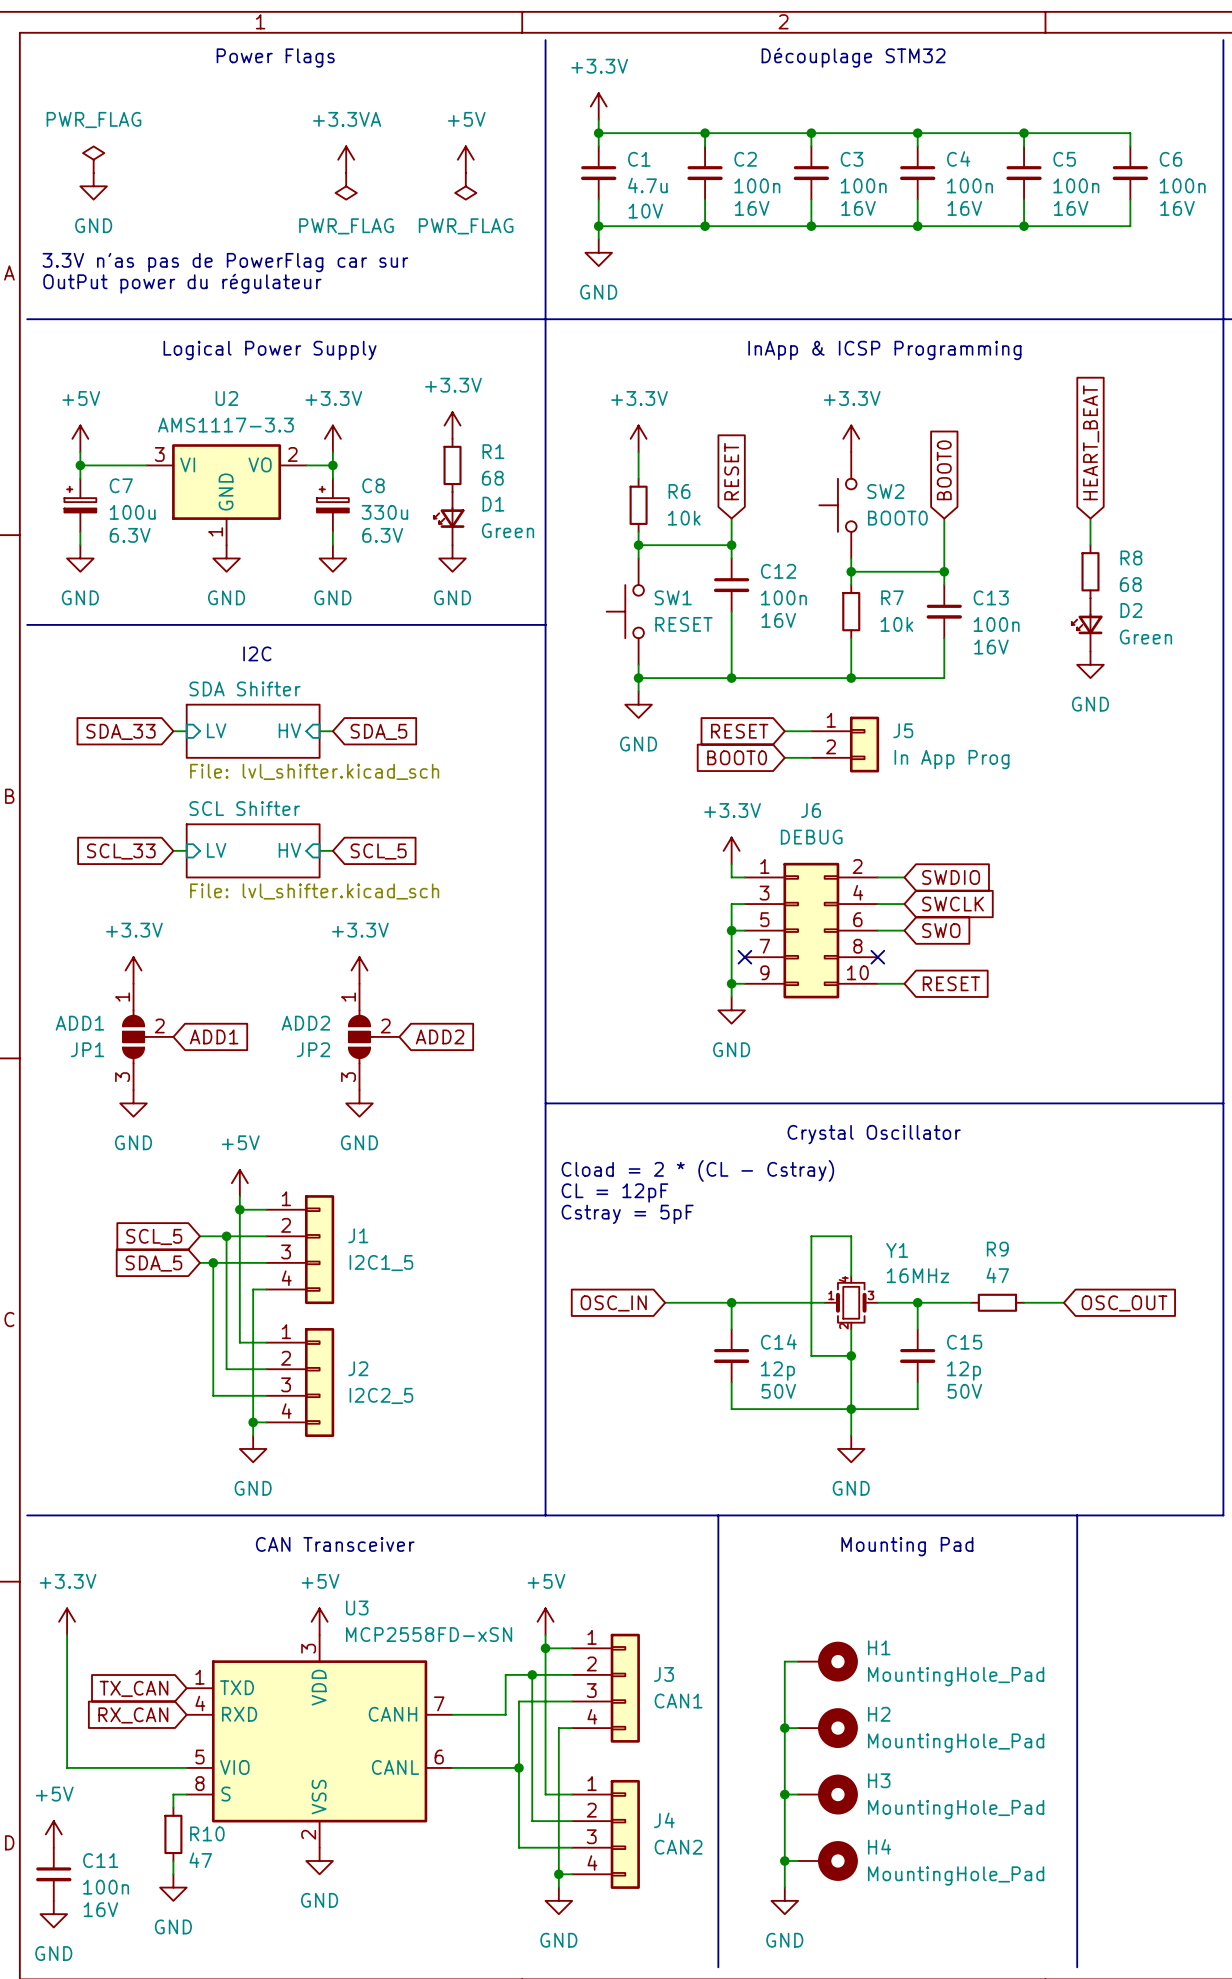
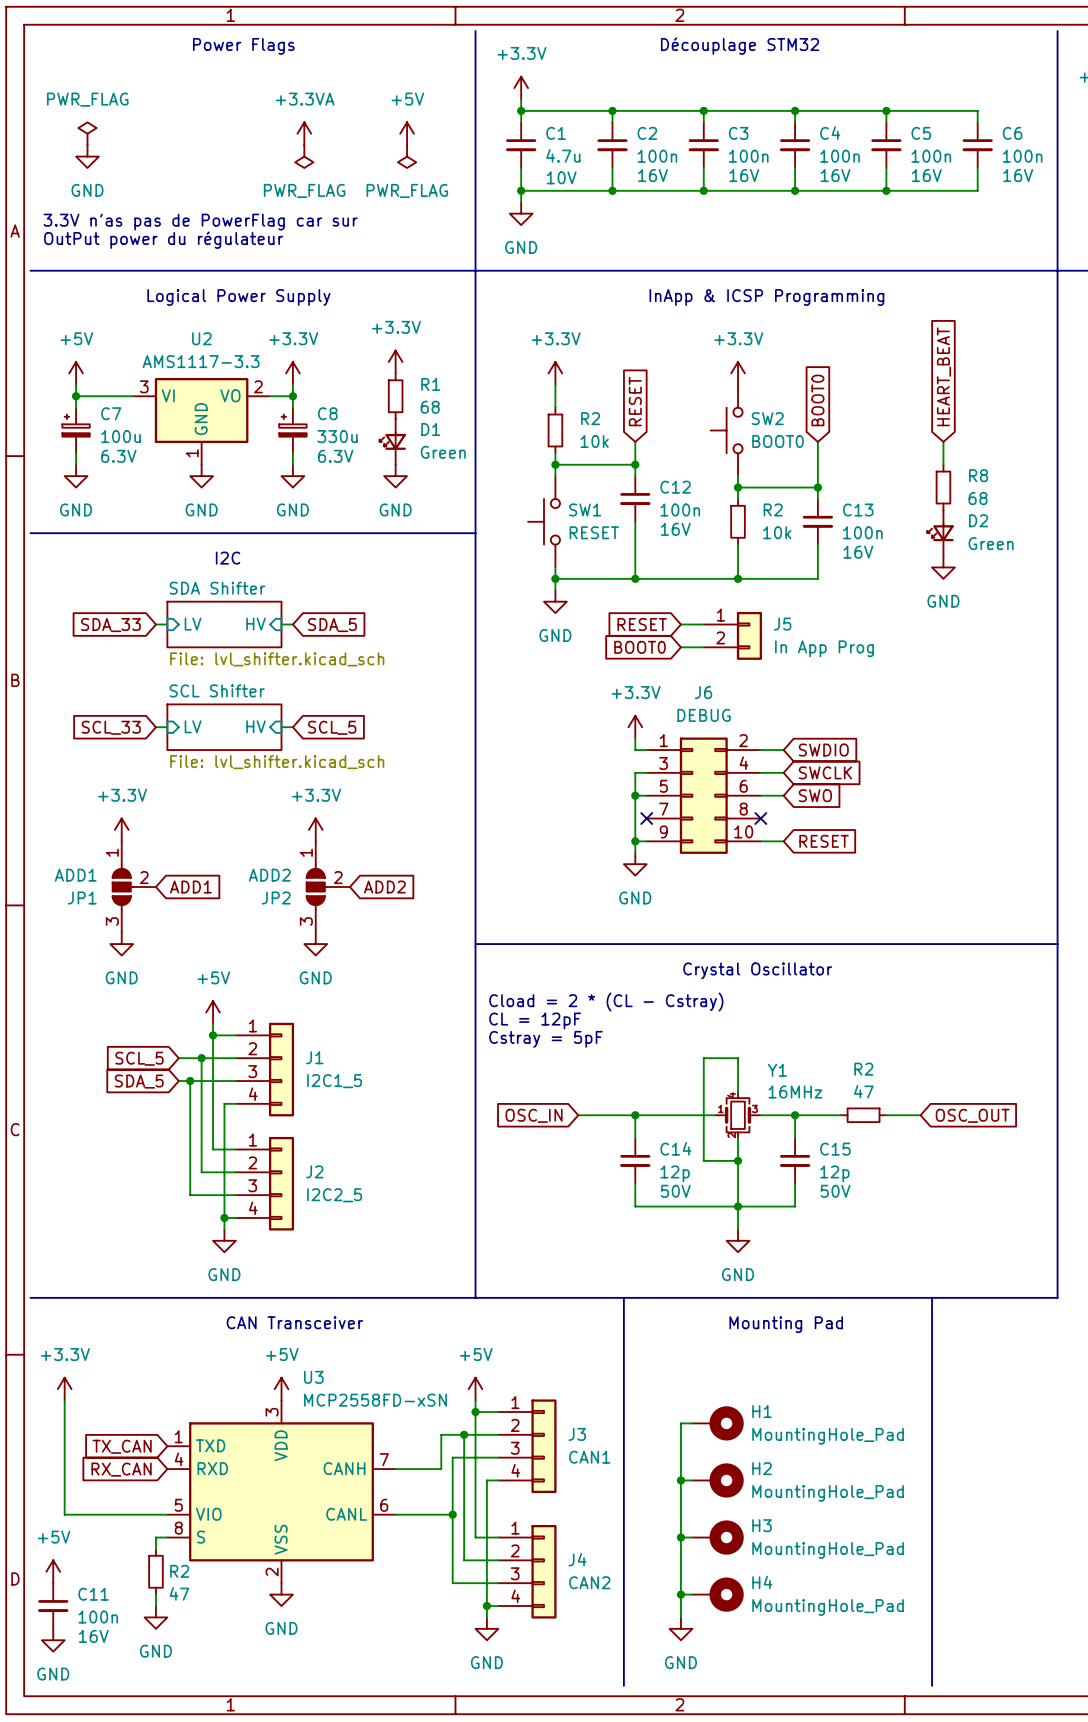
R6 name: R6 (679, 491) -> R2 (590, 418)
R7 name: R7 (892, 597) -> R2 (773, 509)
R9 name: R9 (997, 1249) -> R2 (863, 1069)
R10 name: R10 (207, 1833) -> R2 (179, 1571)

